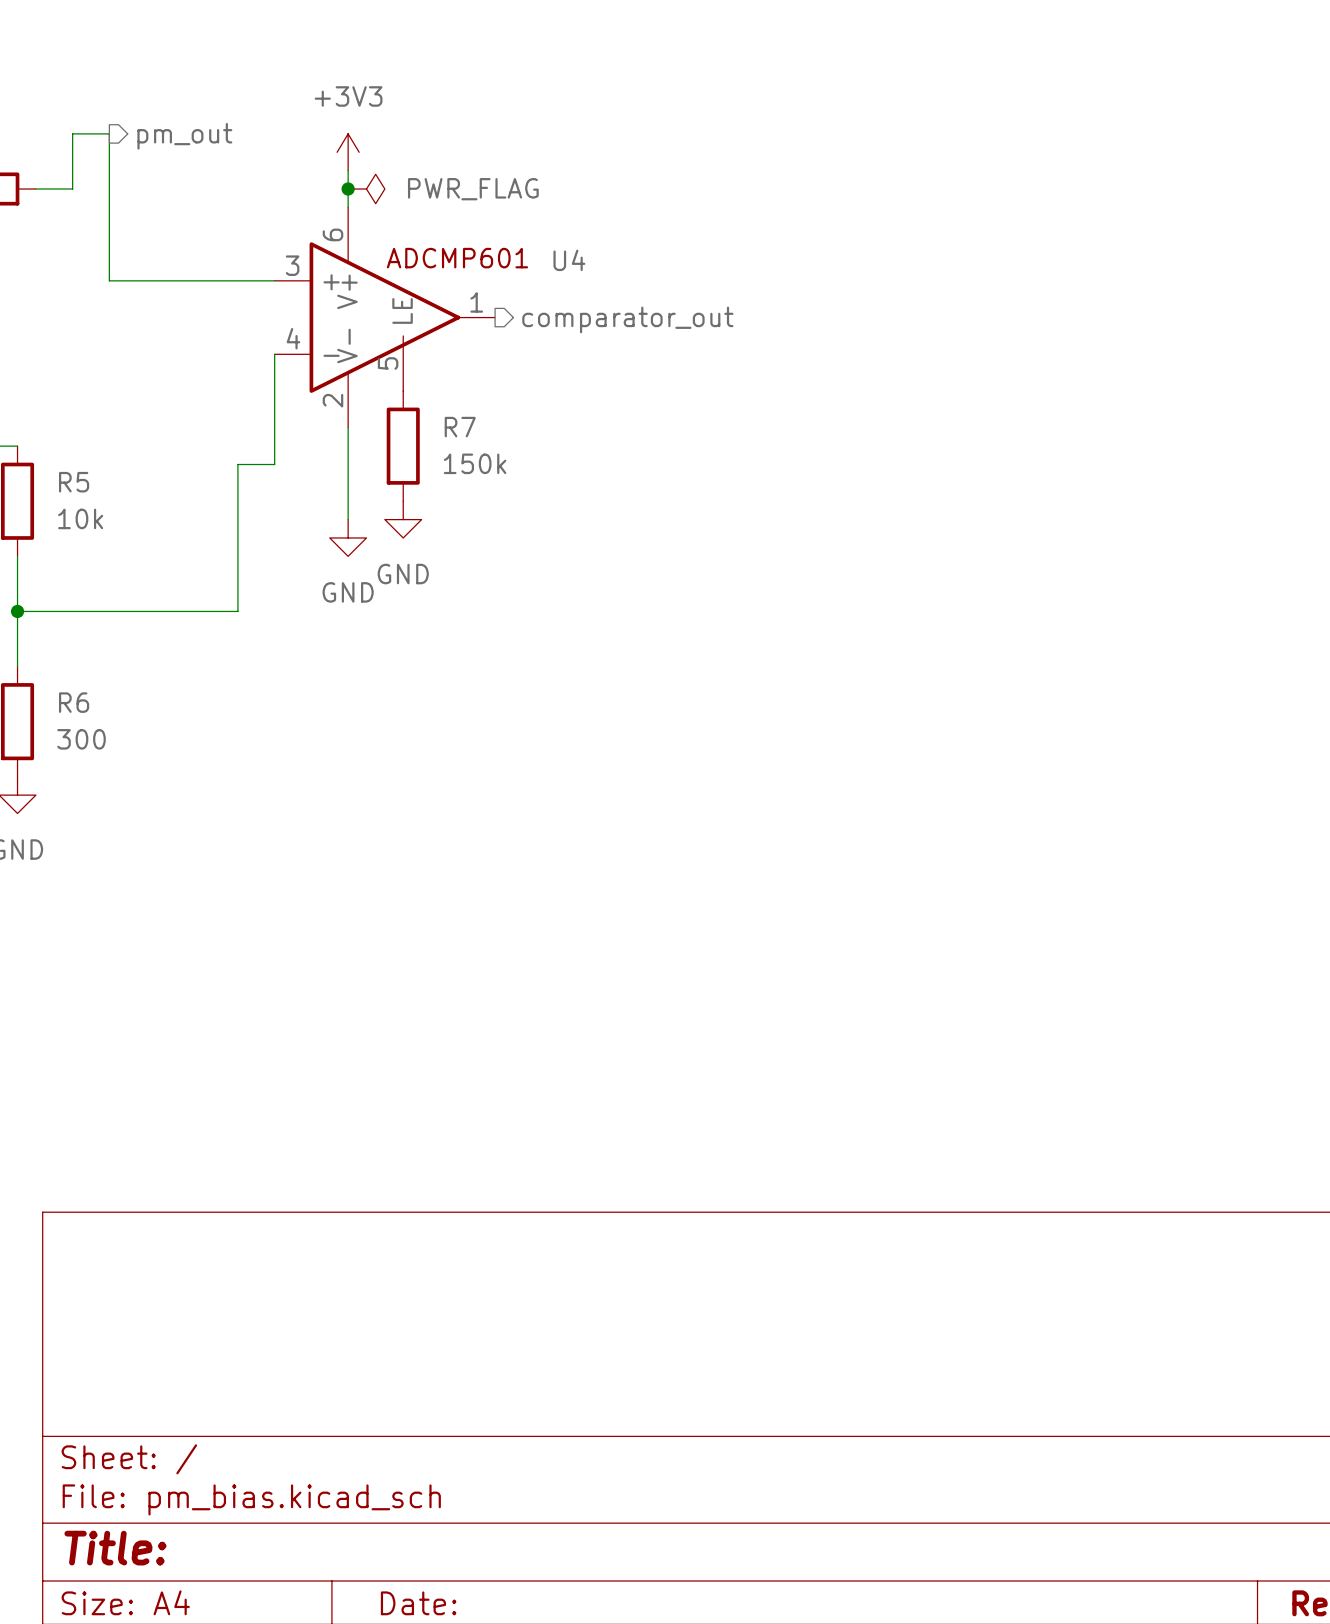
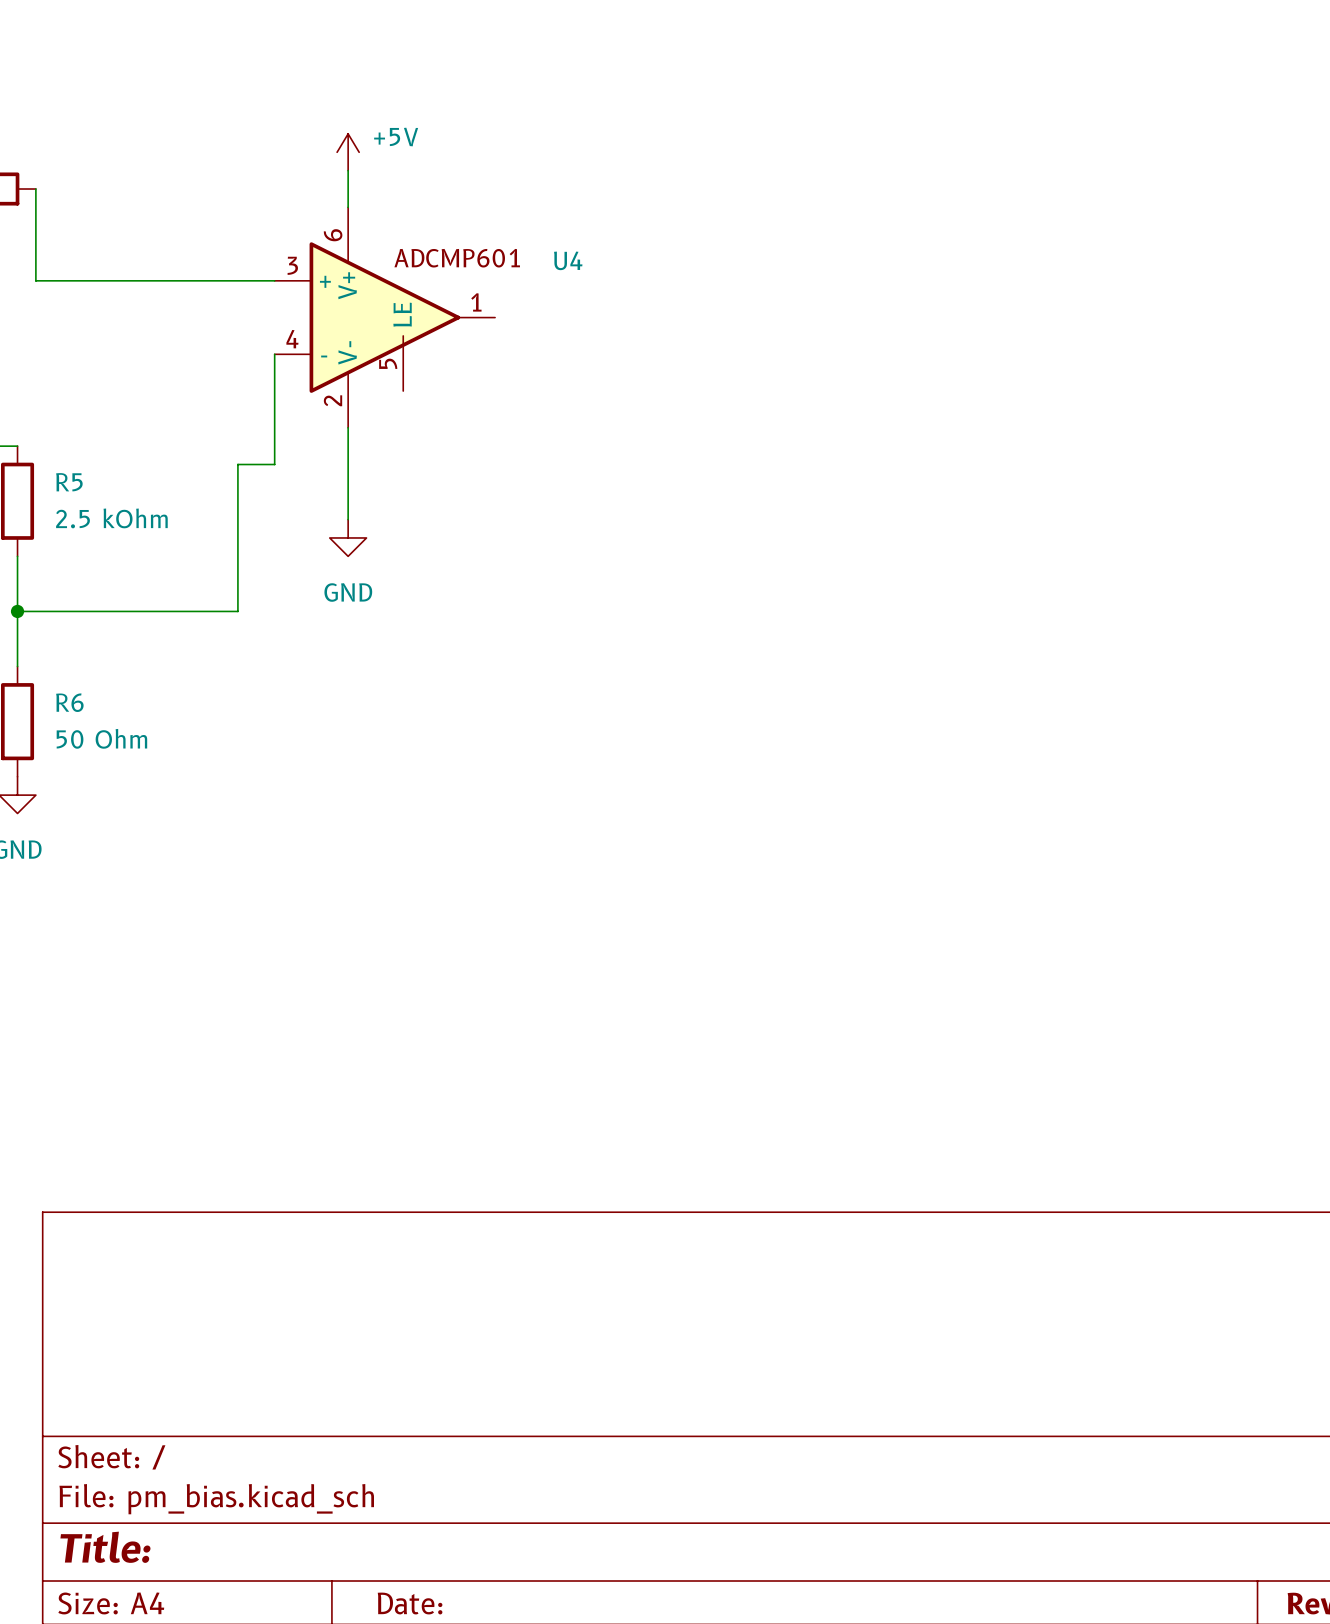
hierarchical label: pm_out (184, 136) -> none
power symbol: +3V3 (348, 152) -> +5V (348, 152)
wire: (35, 189) (72, 189) (72, 133) (109, 133) (109, 280) -> (35, 189) (35, 280) (109, 280)
junction: (348, 189) -> none
power symbol: PWR_FLAG (366, 189) -> none
hierarchical label: comparator_out (627, 319) -> none
R7: 150k (403, 446) -> none
R5 value: 10k (80, 518) -> 2.5 kOhm (111, 518)
power symbol: GND (403, 519) -> none
R6 value: 300 (81, 739) -> 50 Ohm (101, 738)

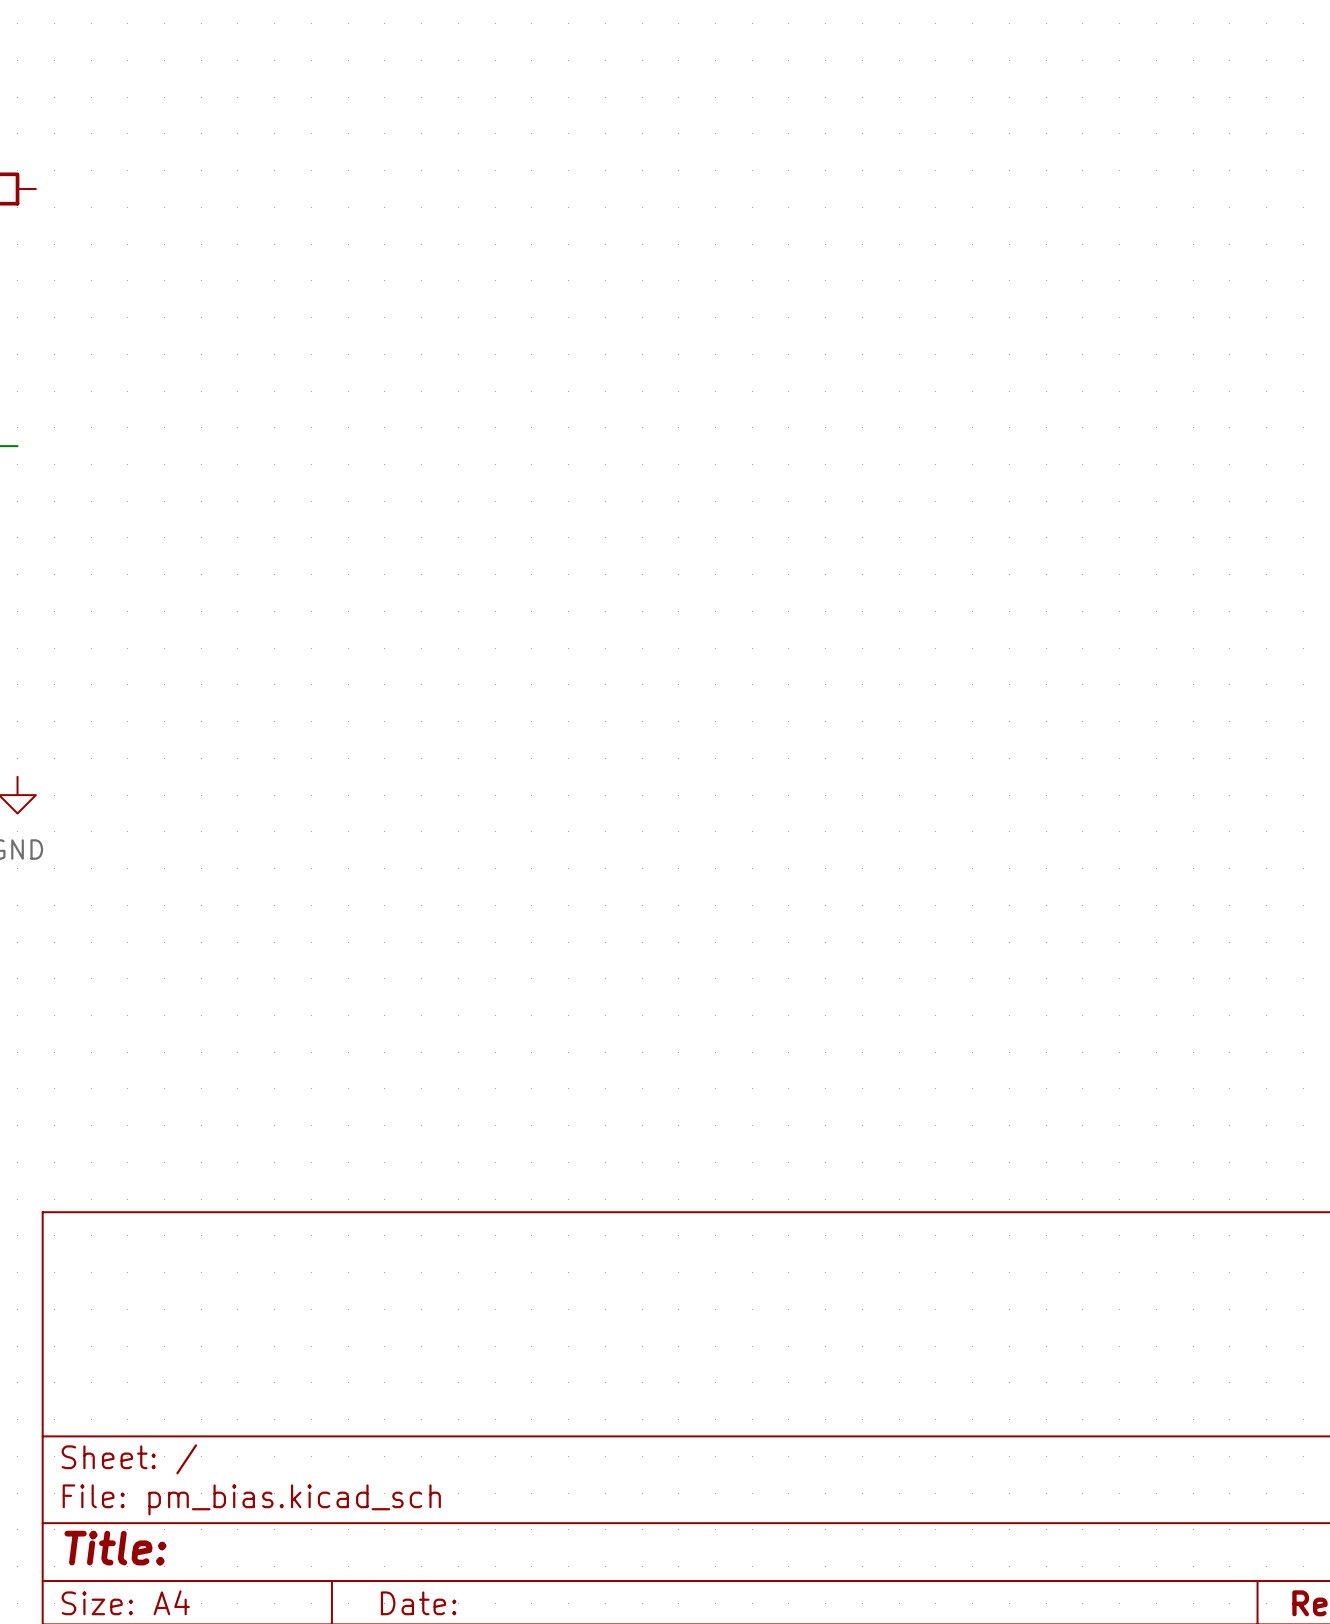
power symbol: +5V (348, 152) -> none
wire: (348, 170) (348, 207) -> none
wire: (35, 189) (35, 280) (274, 280) -> none
U4: (384, 317) -> none
wire: (274, 354) (274, 464) (237, 464) (237, 611) (17, 611) -> none
wire: (348, 427) (348, 519) -> none
R5: 2.5 kOhm (17, 501) -> none
power symbol: GND (348, 537) -> none
wire: (17, 556) (17, 666) -> none
junction: (17, 611) -> none
R6: 50 Ohm (17, 721) -> none

